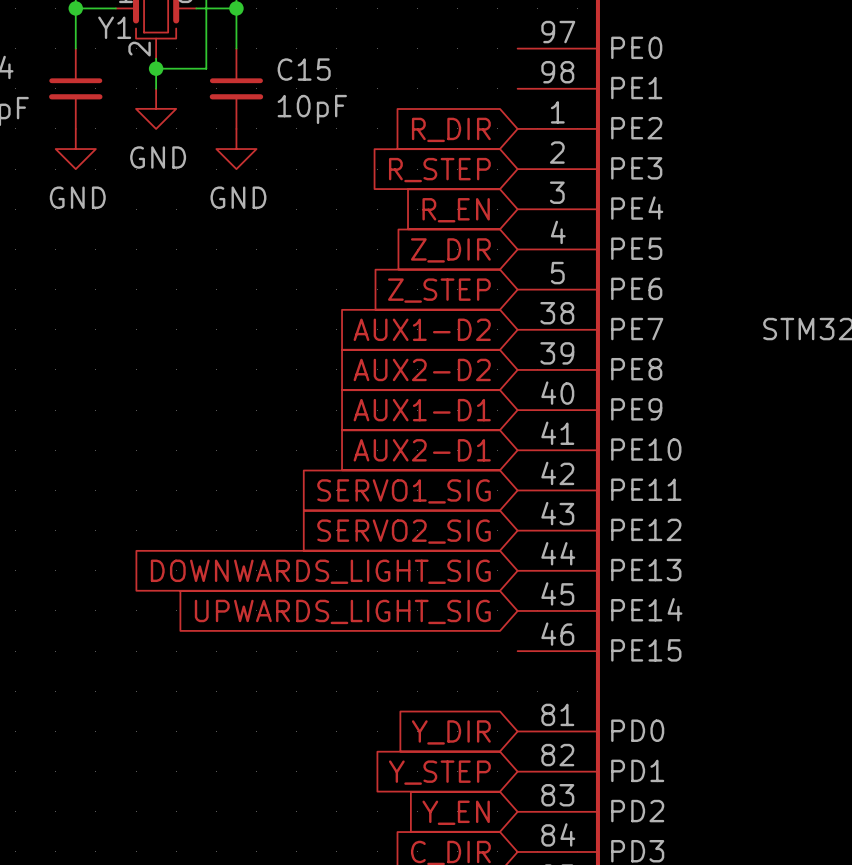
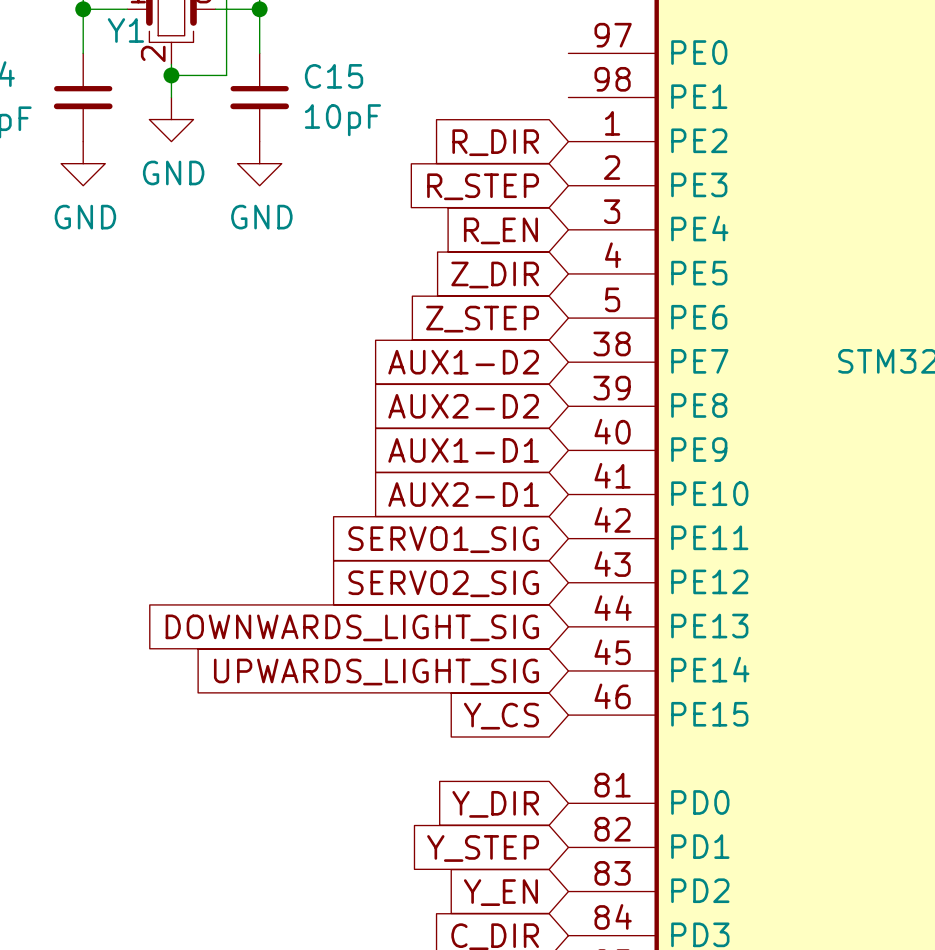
global label: none -> Y_CS (501, 716)

